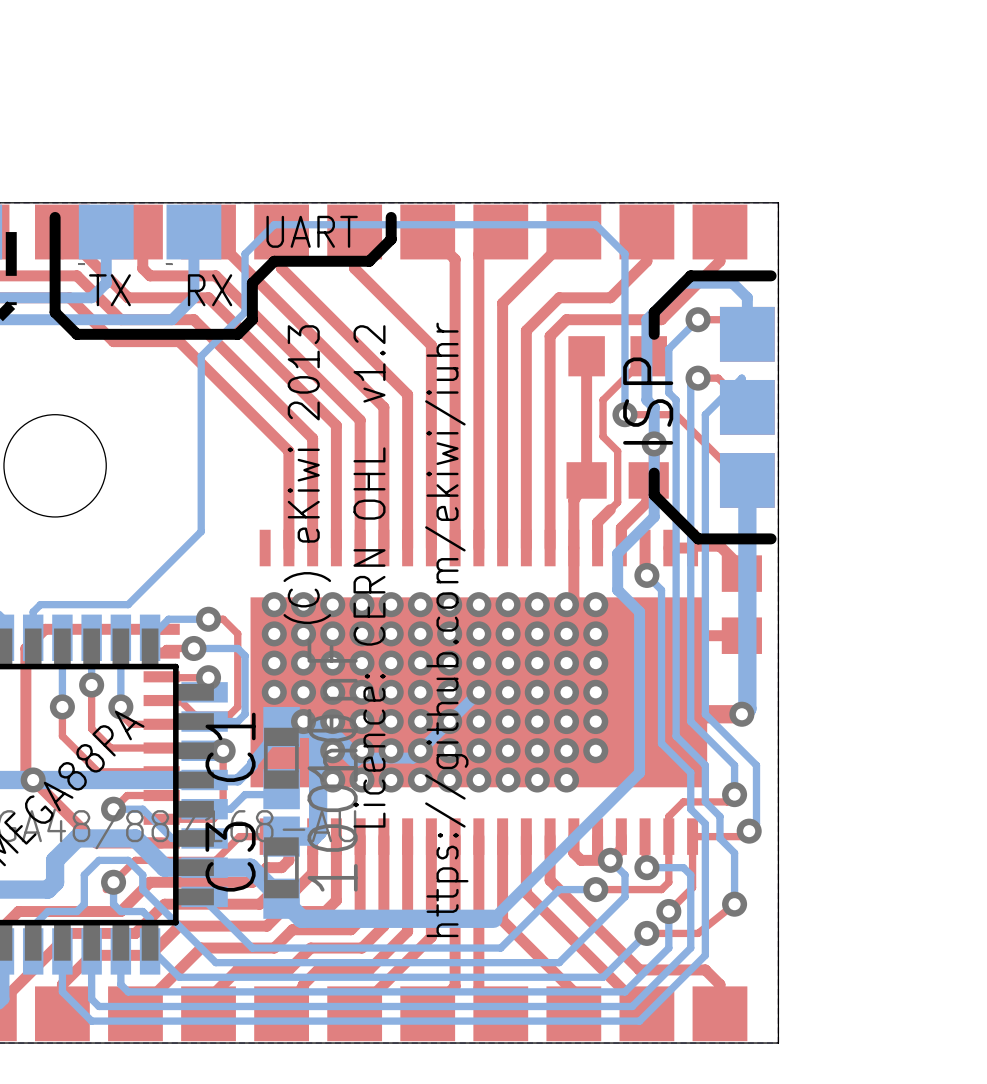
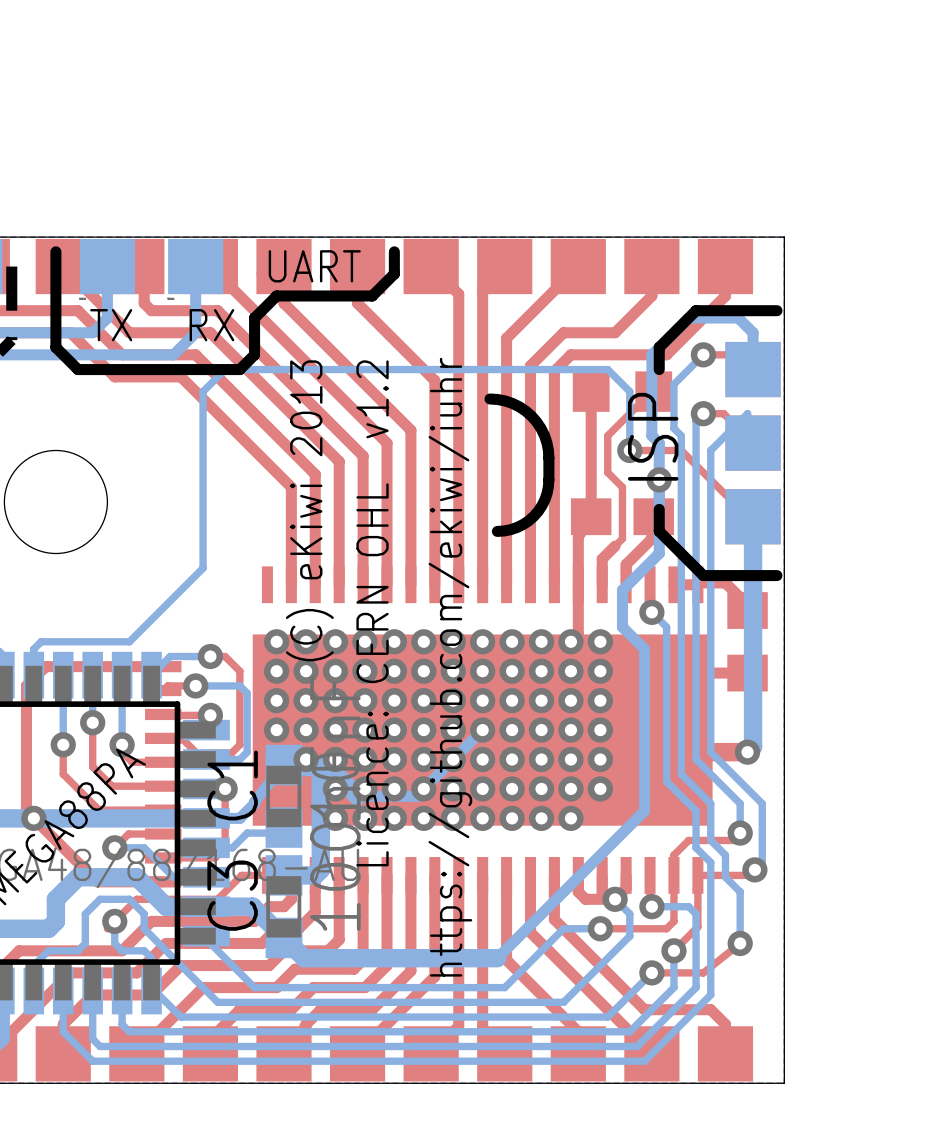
bottom track: (223, 334) (245, 312) (245, 253) (274, 224) (595, 224) (624, 253) (624, 356) -> (225, 369) (607, 369) (629, 391)
line: none -> (490, 398) (512, 403) (531, 416) (544, 435) (548, 457) (547, 493) (538, 511) (528, 520) (517, 527) (497, 531)

